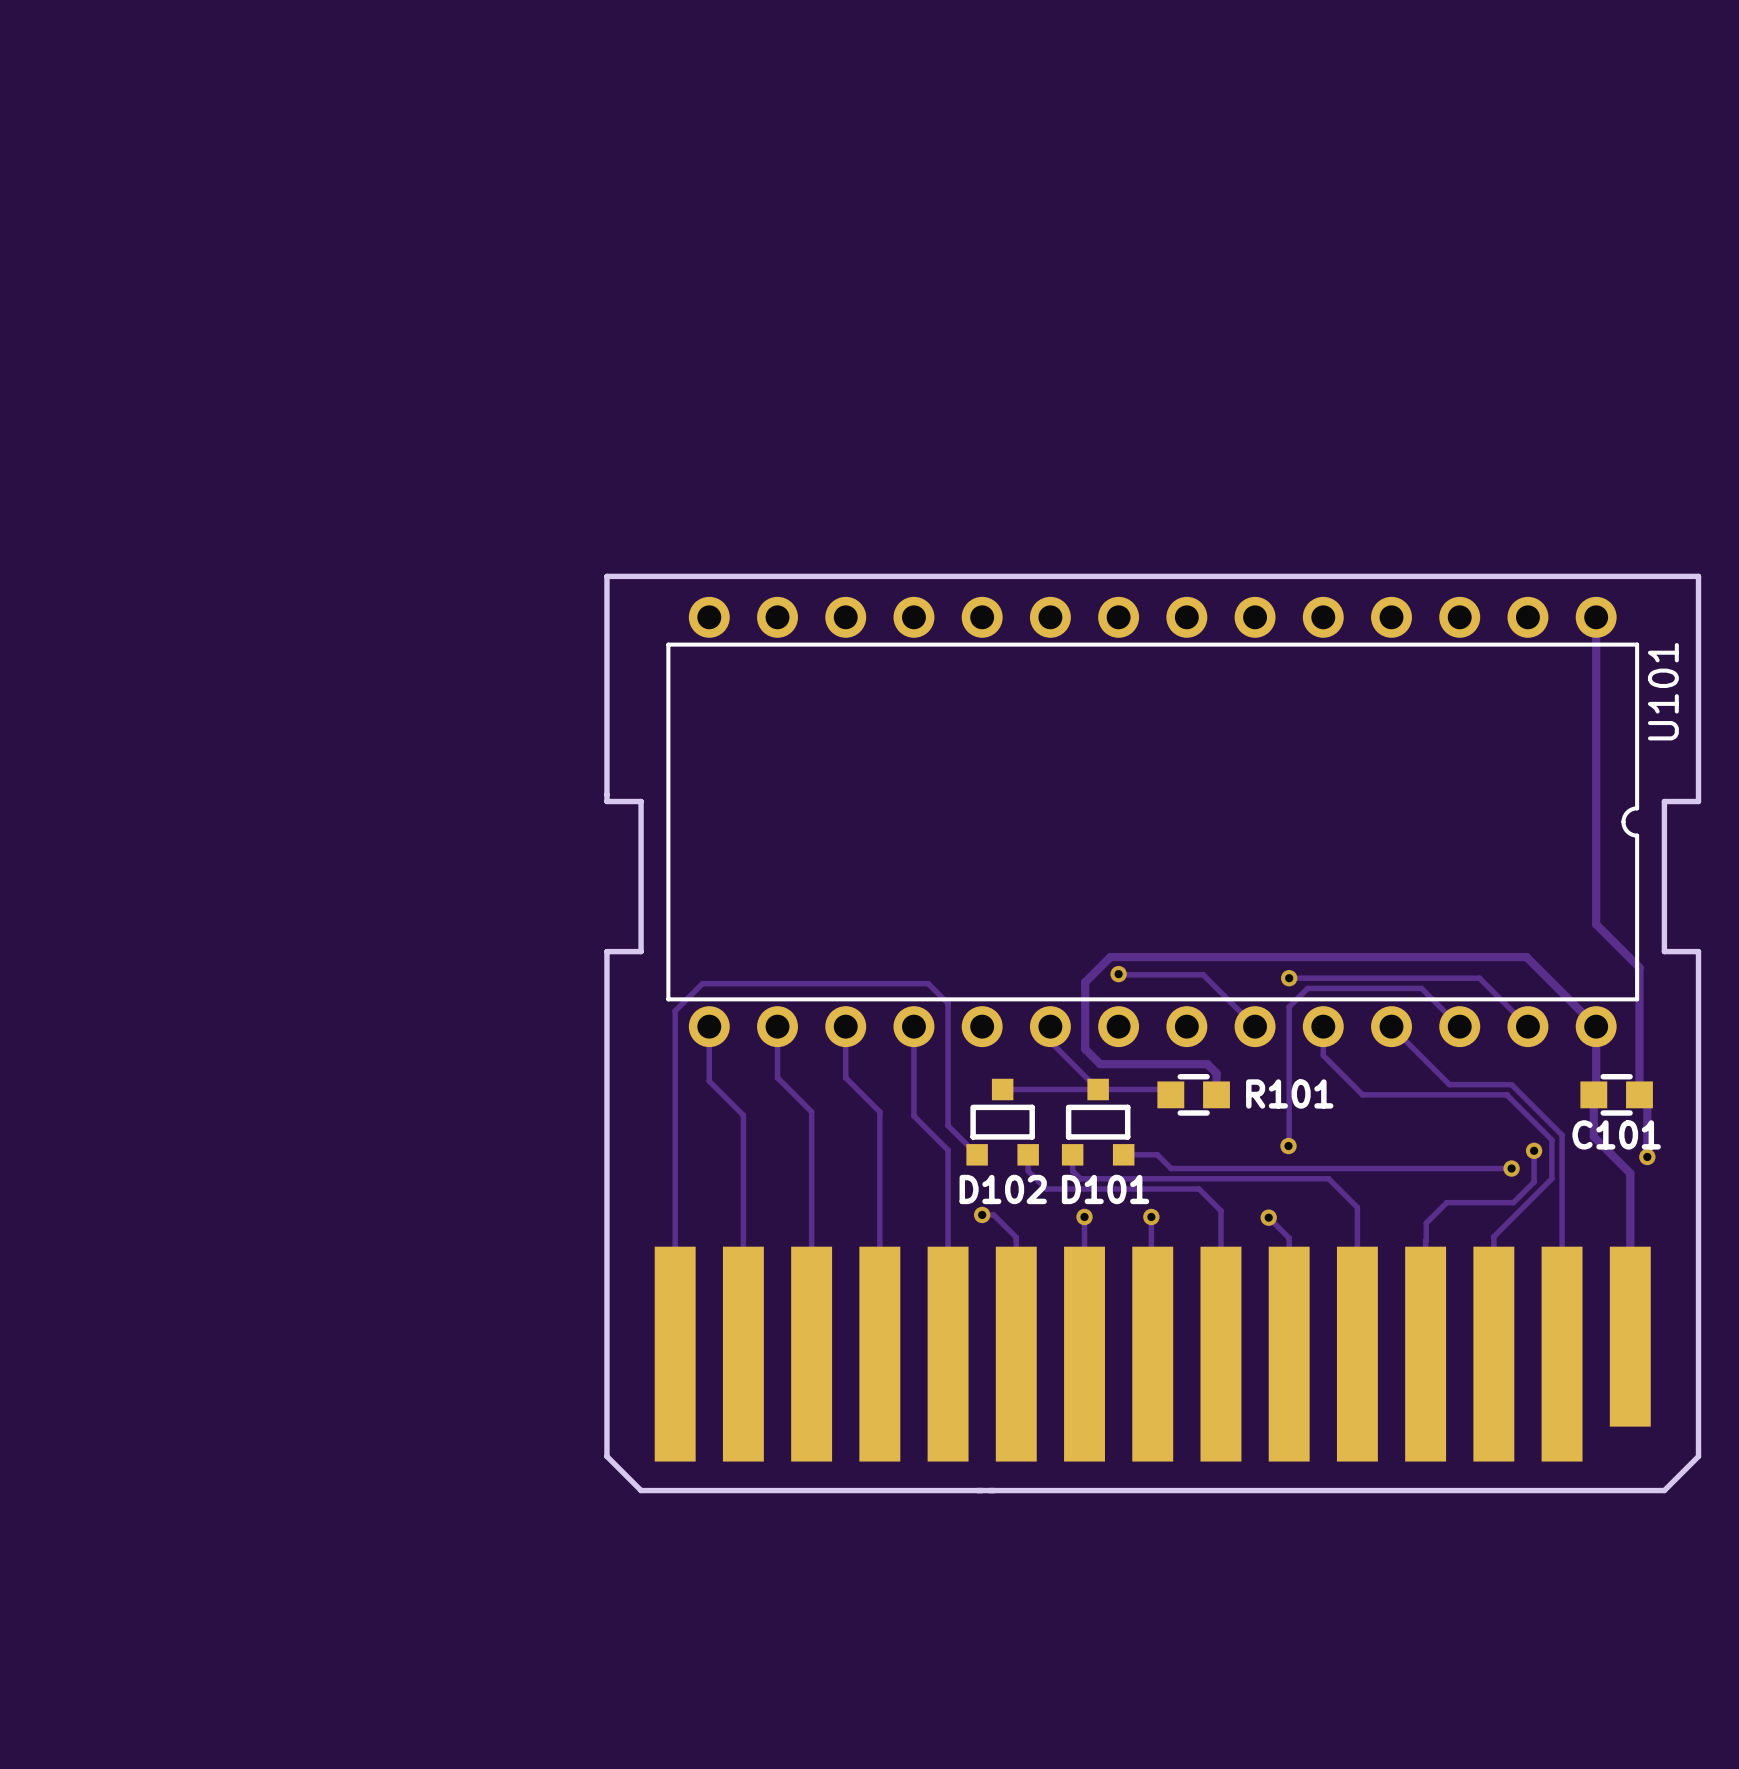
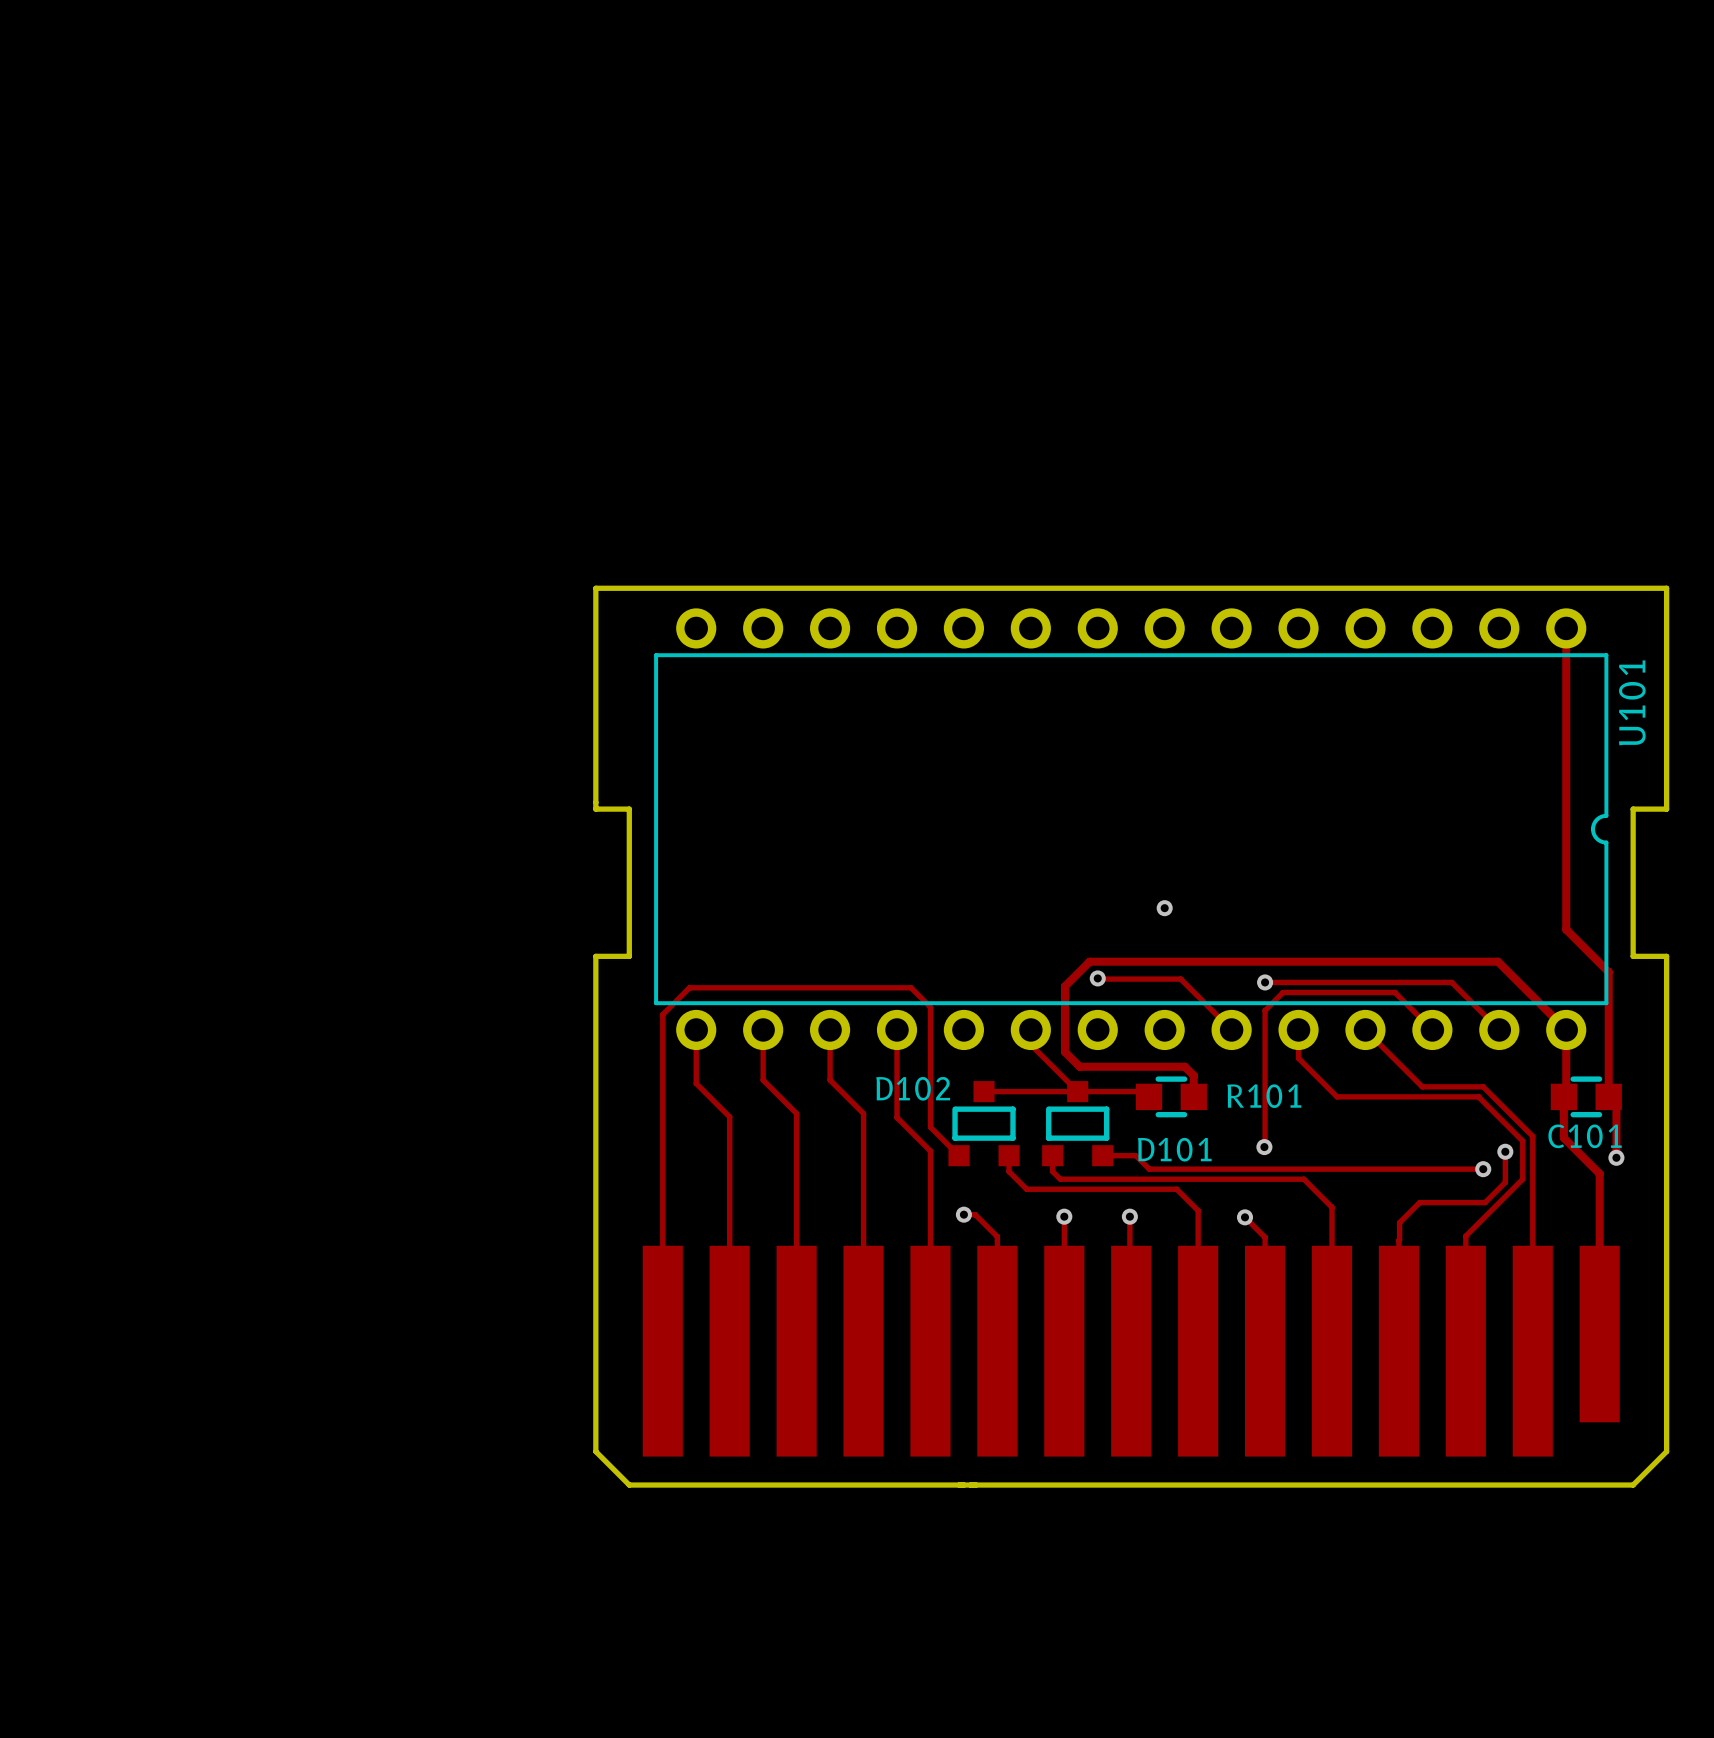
via: none -> (1164, 908)
D102 name position: D102 (1003, 1189) -> D102 (913, 1088)
D101 name position: D101 (1105, 1189) -> D101 (1174, 1149)

